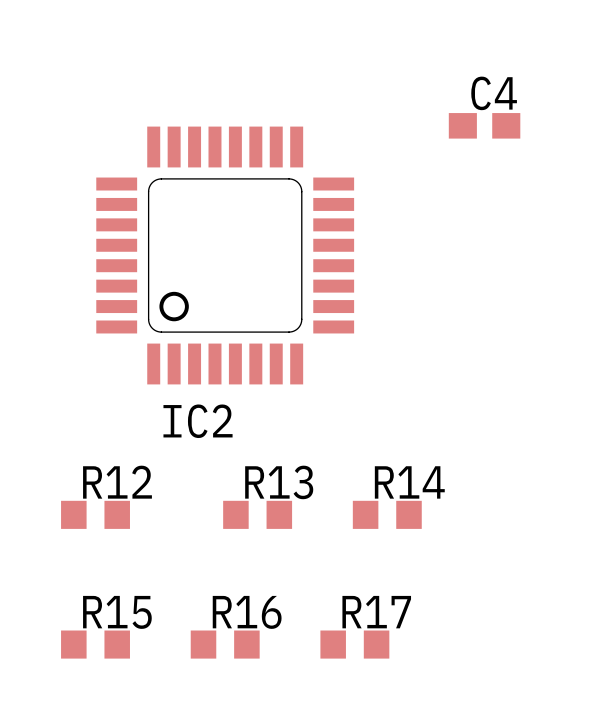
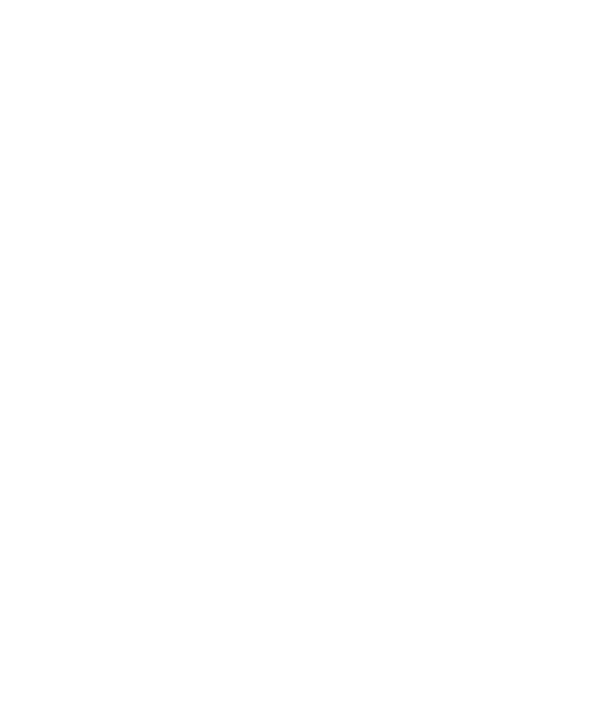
C4: (484, 125) -> none
IC2: (225, 255) -> none
R12: (95, 514) -> none
R13: (257, 514) -> none
R14: (387, 514) -> none
R15: (95, 644) -> none
R16: (225, 644) -> none
R17: (354, 644) -> none

